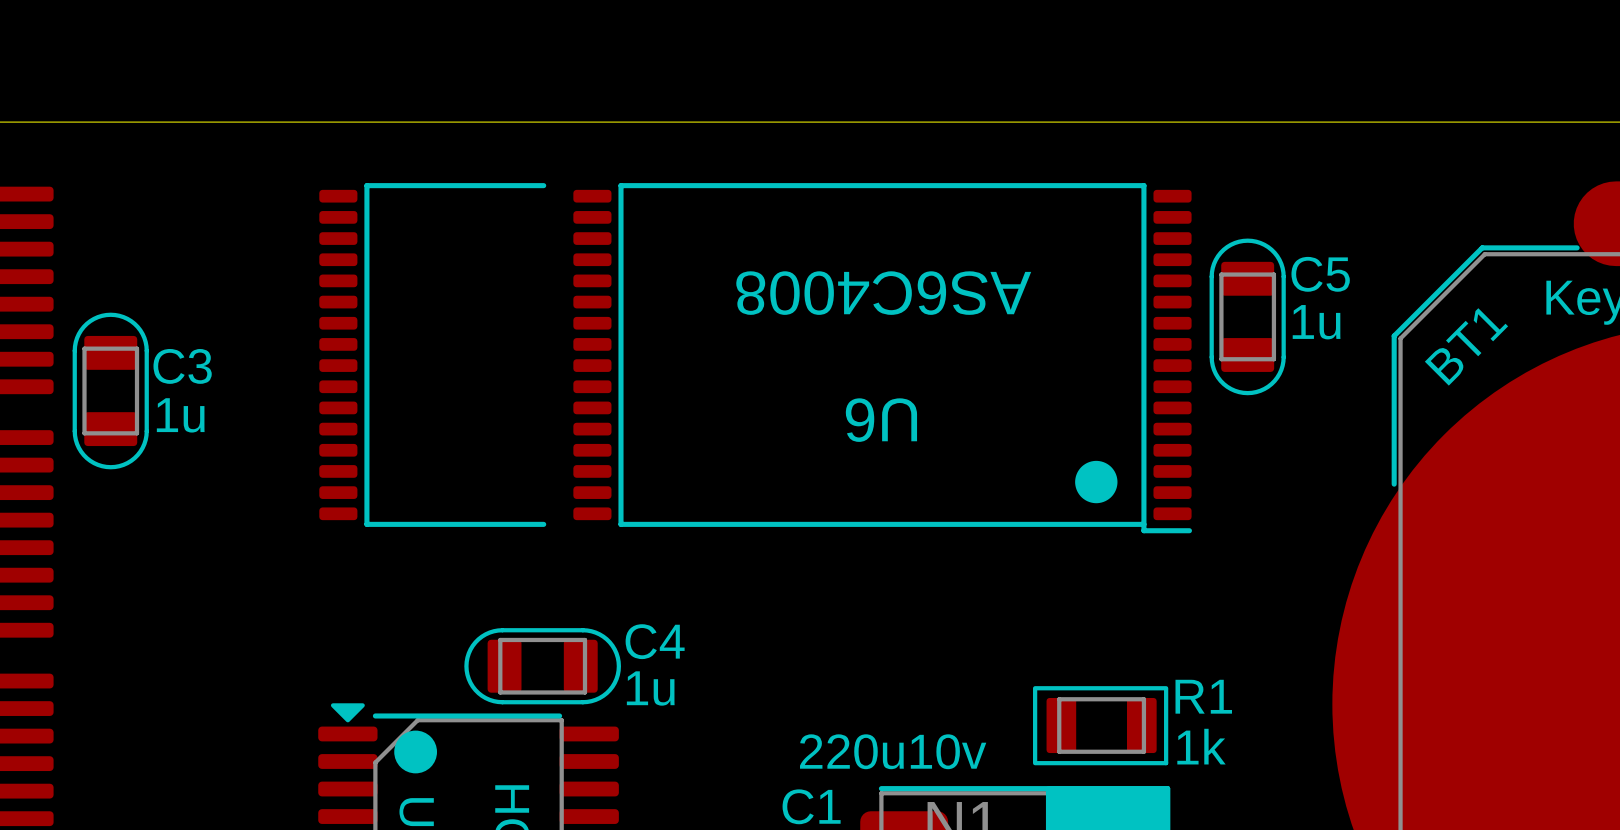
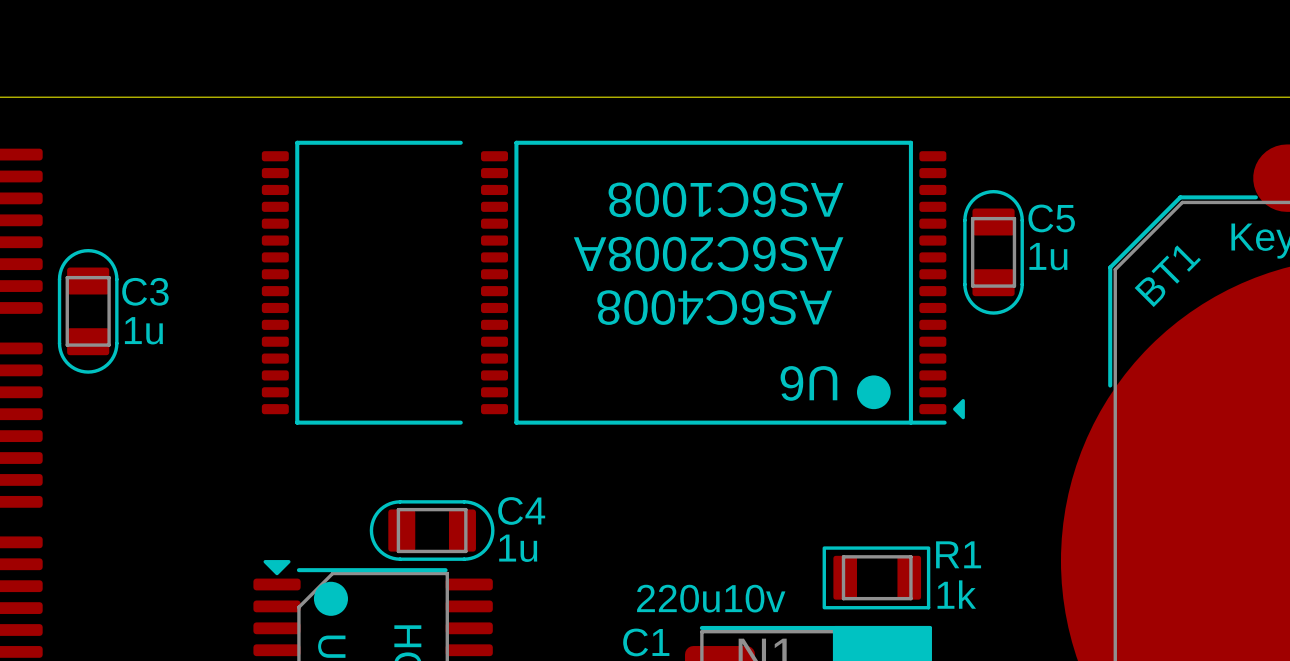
U6 footprint: [319, 183, 1193, 534] -> [261, 140, 965, 425]
text: none -> AS6C1008 (725, 199)
U6 value position: AS6C4008 (883, 293) -> AS6C4008 (714, 307)
text: none -> AS6C2008A (708, 254)
U6 name position: U6 (881, 420) -> U6 (808, 383)

